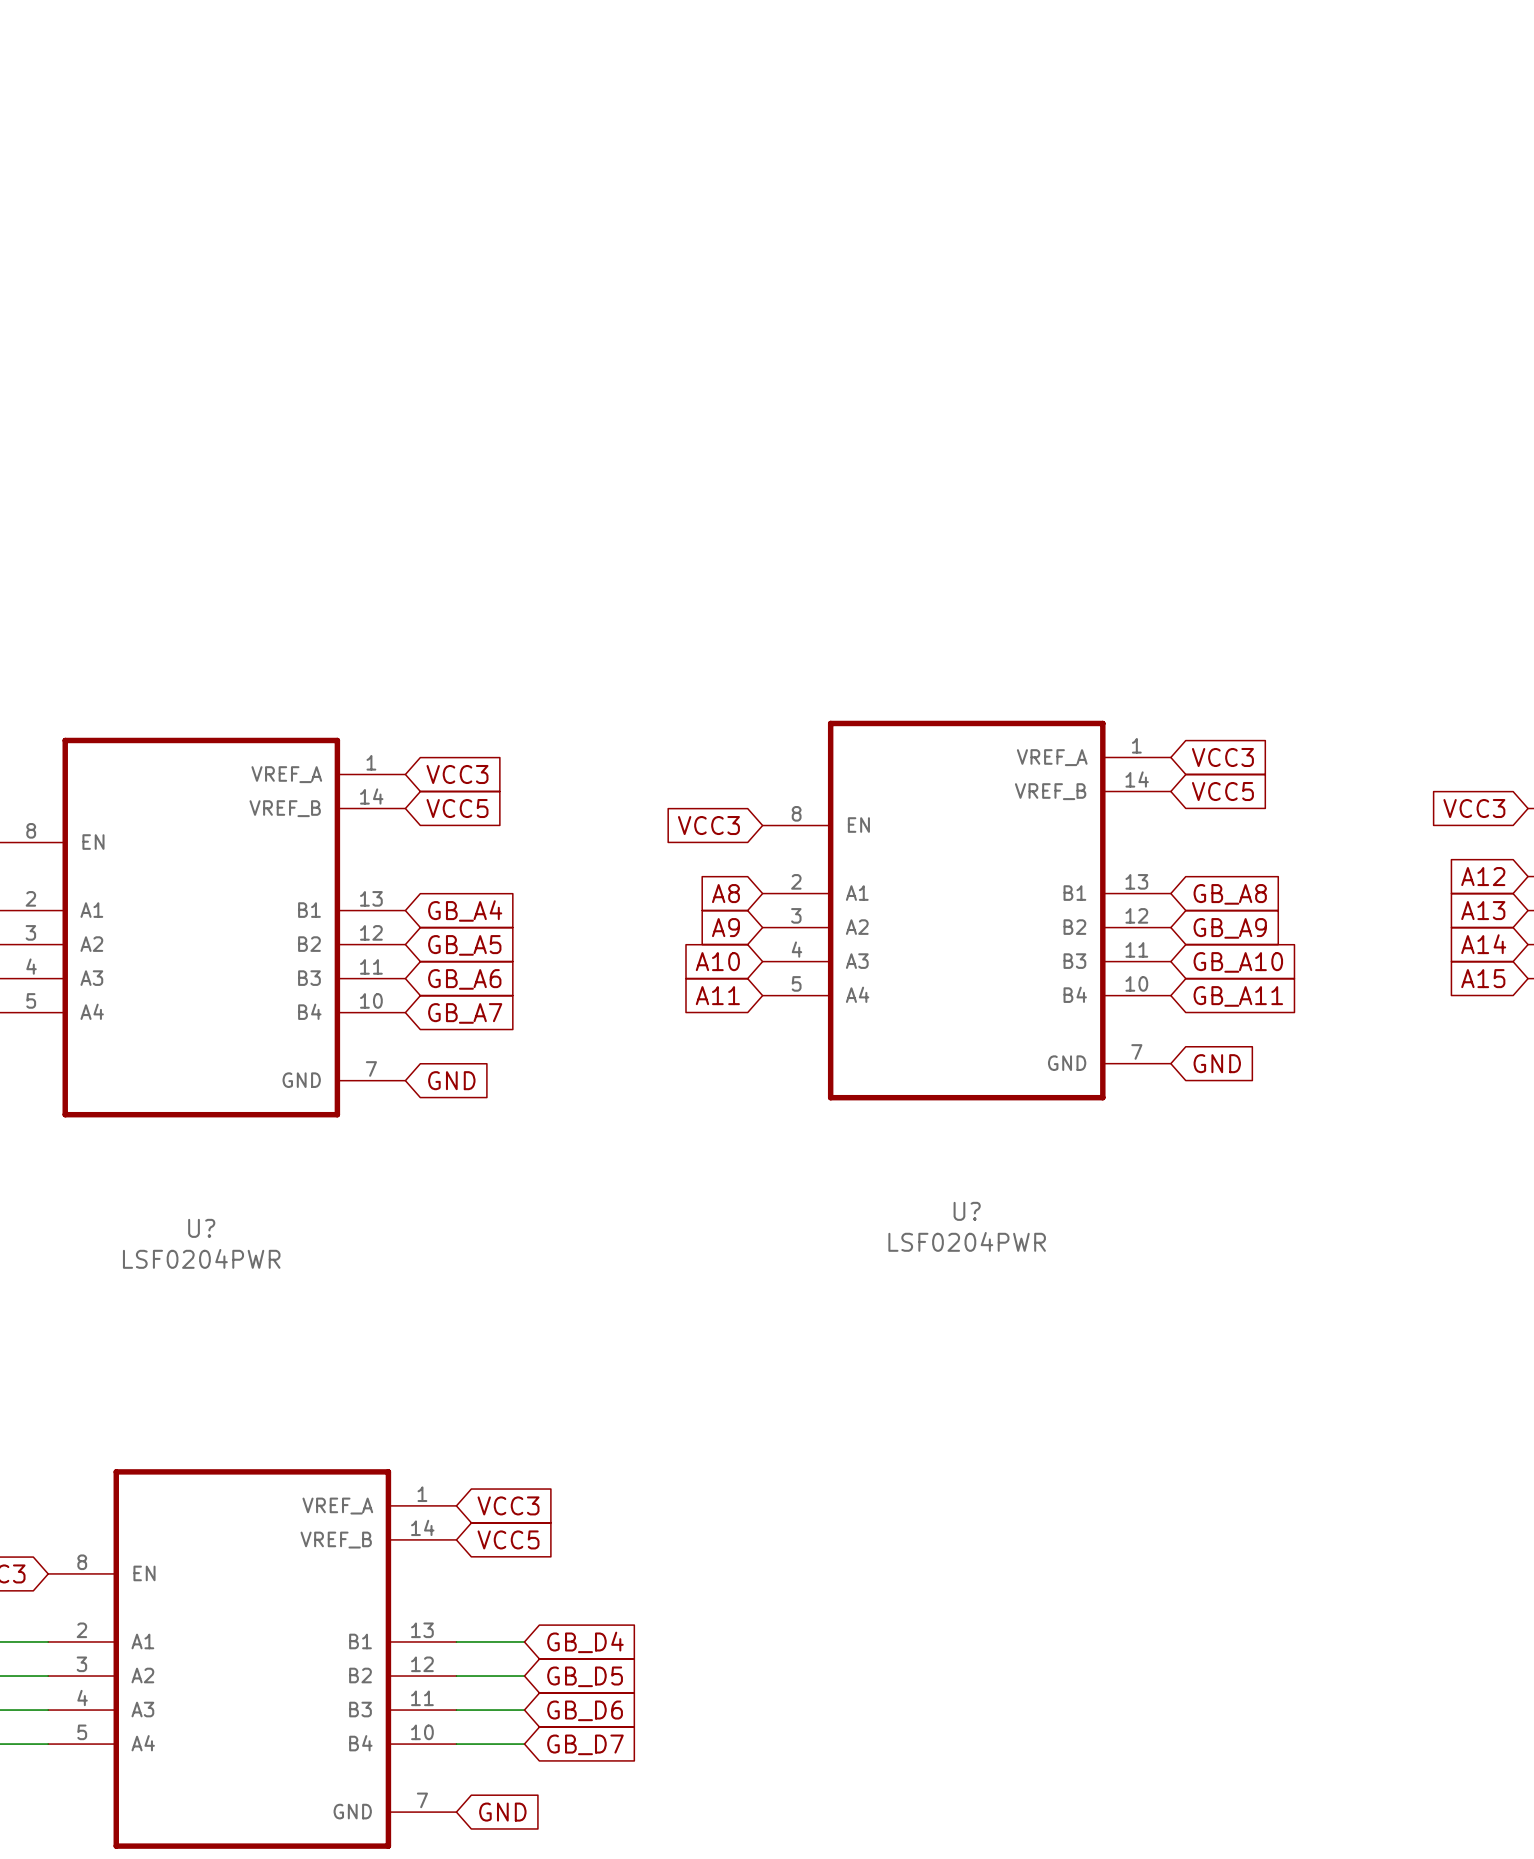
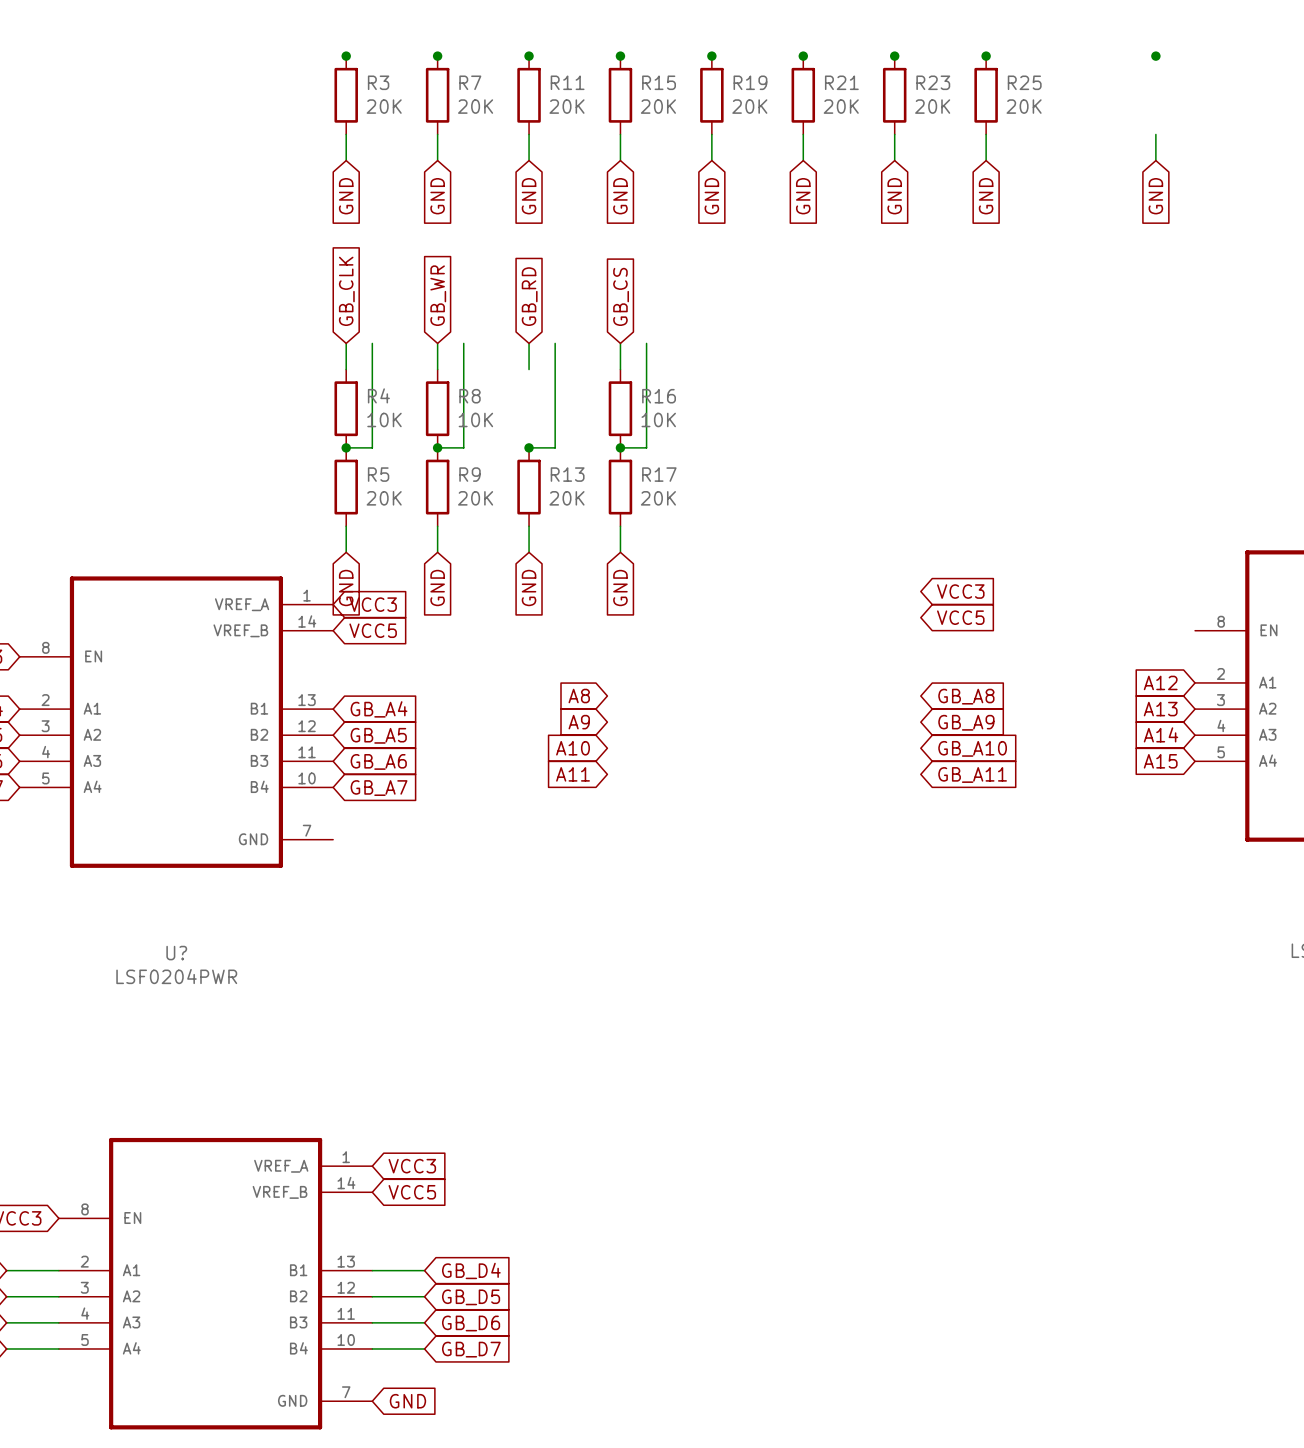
junction: none -> (346, 56)
junction: none -> (437, 56)
junction: none -> (529, 56)
junction: none -> (620, 56)
junction: none -> (711, 56)
junction: none -> (803, 56)
junction: none -> (894, 56)
junction: none -> (986, 56)
junction: none -> (1155, 56)
R3: none -> 20K (346, 95)
R7: none -> 20K (437, 95)
R11: none -> 20K (529, 95)
R15: none -> 20K (620, 95)
R19: none -> 20K (711, 95)
R21: none -> 20K (803, 95)
R23: none -> 20K (894, 95)
R25: none -> 20K (986, 95)
wire: none -> (346, 134) (346, 160)
wire: none -> (437, 134) (437, 160)
wire: none -> (529, 134) (529, 160)
wire: none -> (620, 134) (620, 160)
wire: none -> (711, 134) (711, 160)
wire: none -> (803, 134) (803, 160)
wire: none -> (894, 134) (894, 160)
wire: none -> (986, 134) (986, 160)
wire: none -> (1155, 134) (1155, 160)
global label: none -> GND (346, 196)
global label: none -> GND (437, 196)
global label: none -> GND (529, 196)
global label: none -> GND (620, 196)
global label: none -> GND (711, 196)
global label: none -> GND (803, 196)
global label: none -> GND (894, 196)
global label: none -> GND (986, 196)
global label: none -> GND (1155, 196)
global label: none -> GB_CLK (346, 291)
global label: none -> GB_WR (438, 295)
global label: none -> GB_RD (529, 296)
global label: none -> GB_CS (621, 296)
wire: none -> (346, 343) (346, 369)
wire: none -> (372, 343) (372, 447) (346, 447)
wire: none -> (437, 343) (437, 369)
wire: none -> (463, 343) (463, 447) (437, 447)
wire: none -> (529, 343) (529, 369)
wire: none -> (555, 343) (555, 447) (529, 447)
wire: none -> (620, 343) (620, 369)
wire: none -> (646, 343) (646, 447) (620, 447)
R4: none -> 10K (346, 408)
R8: none -> 10K (437, 408)
R16: none -> 10K (620, 408)
junction: none -> (346, 447)
junction: none -> (437, 447)
junction: none -> (529, 447)
junction: none -> (620, 447)
R5: none -> 20K (346, 487)
R9: none -> 20K (437, 487)
R13: none -> 20K (529, 487)
R17: none -> 20K (620, 487)
wire: none -> (346, 526) (346, 552)
wire: none -> (437, 526) (437, 552)
wire: none -> (529, 526) (529, 552)
wire: none -> (620, 526) (620, 552)
global label: none -> GND (346, 587)
global label: none -> GND (437, 587)
global label: none -> GND (529, 587)
global label: none -> GND (620, 587)
global label: VCC3 (1474, 808) -> none
global label: VCC3 (708, 825) -> none
U?: LSF0204PWR (966, 910) -> none
global label: GND (1217, 1063) -> none
global label: GND (451, 1080) -> none

